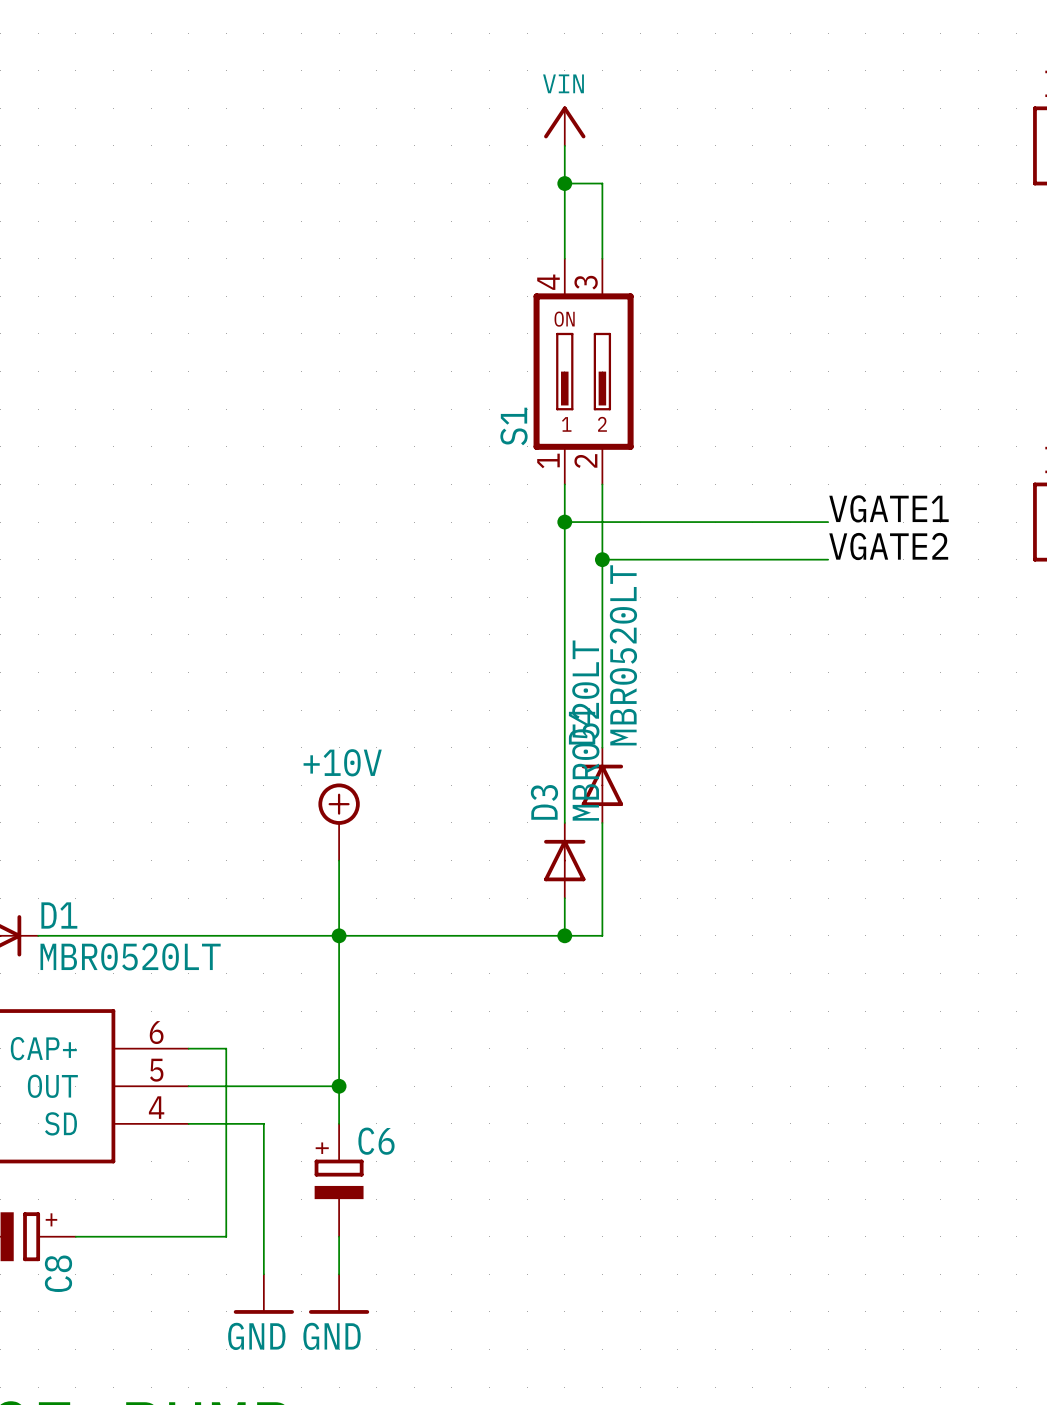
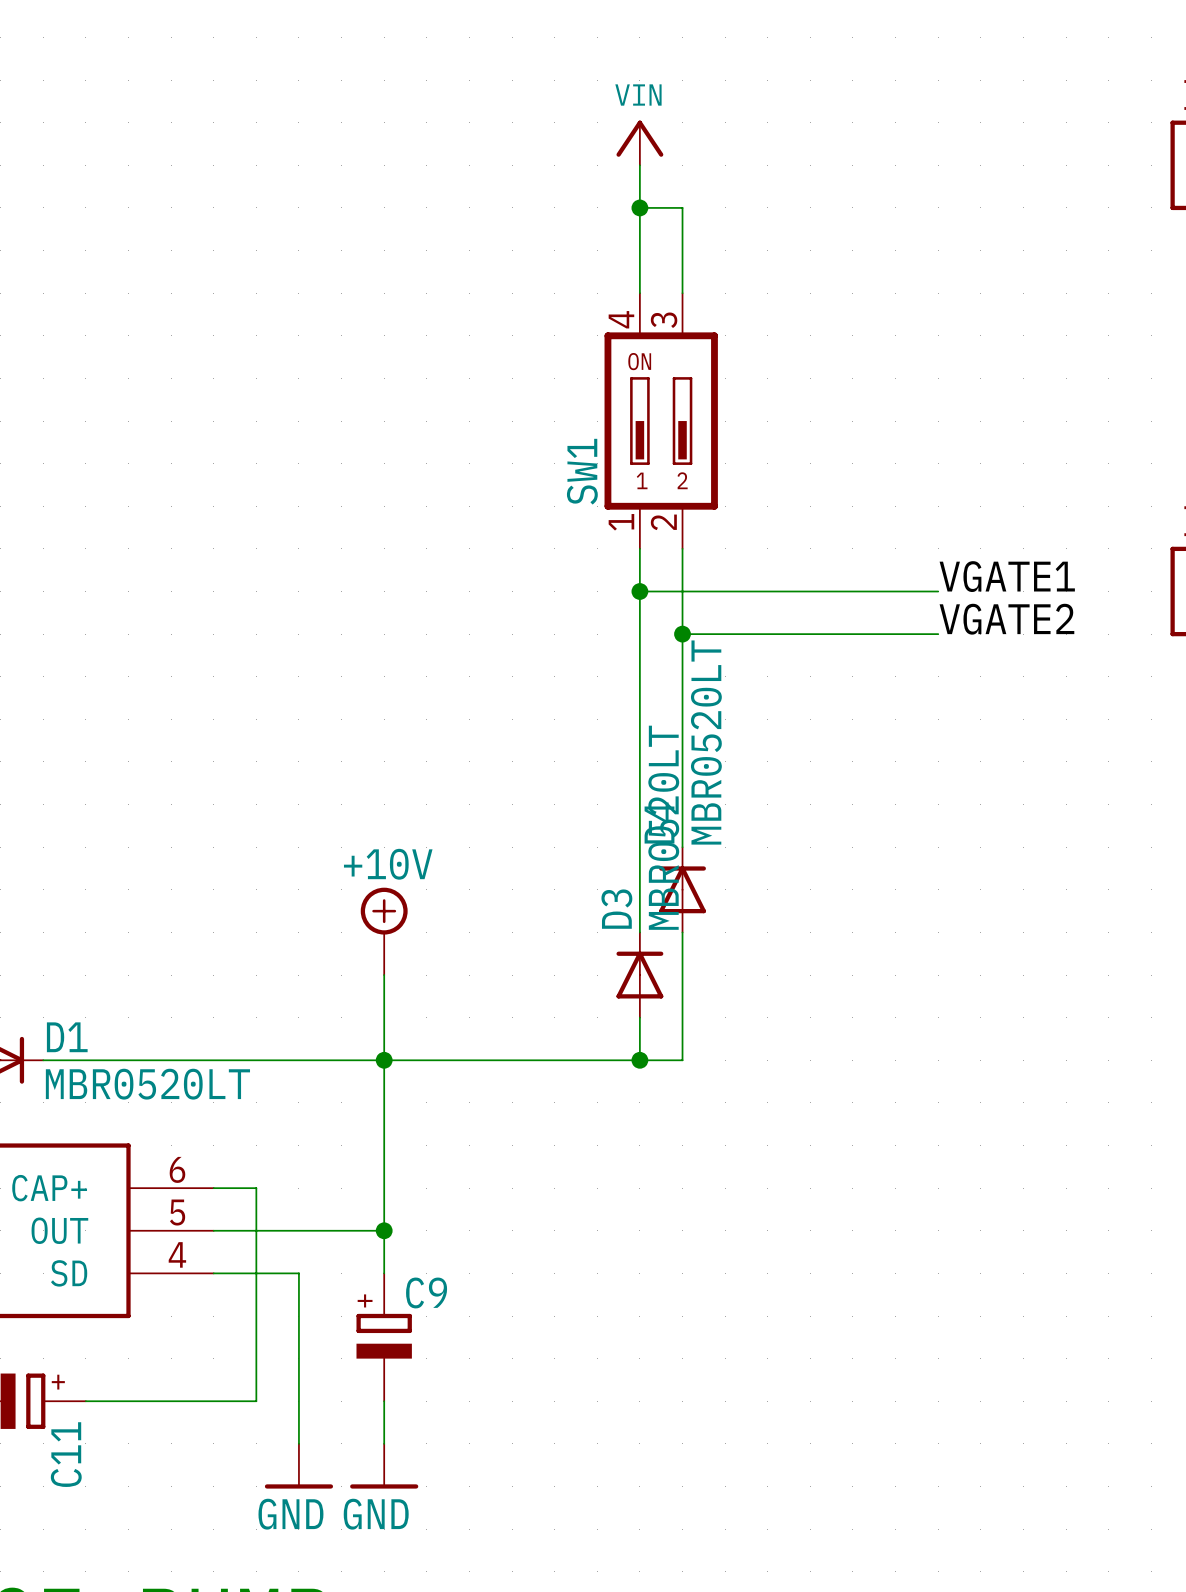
S1 name: S1 (513, 426) -> SW1 (582, 471)
C6 name: C6 (376, 1141) -> C9 (426, 1292)
C8 name: C8 (58, 1273) -> C11 (66, 1454)

